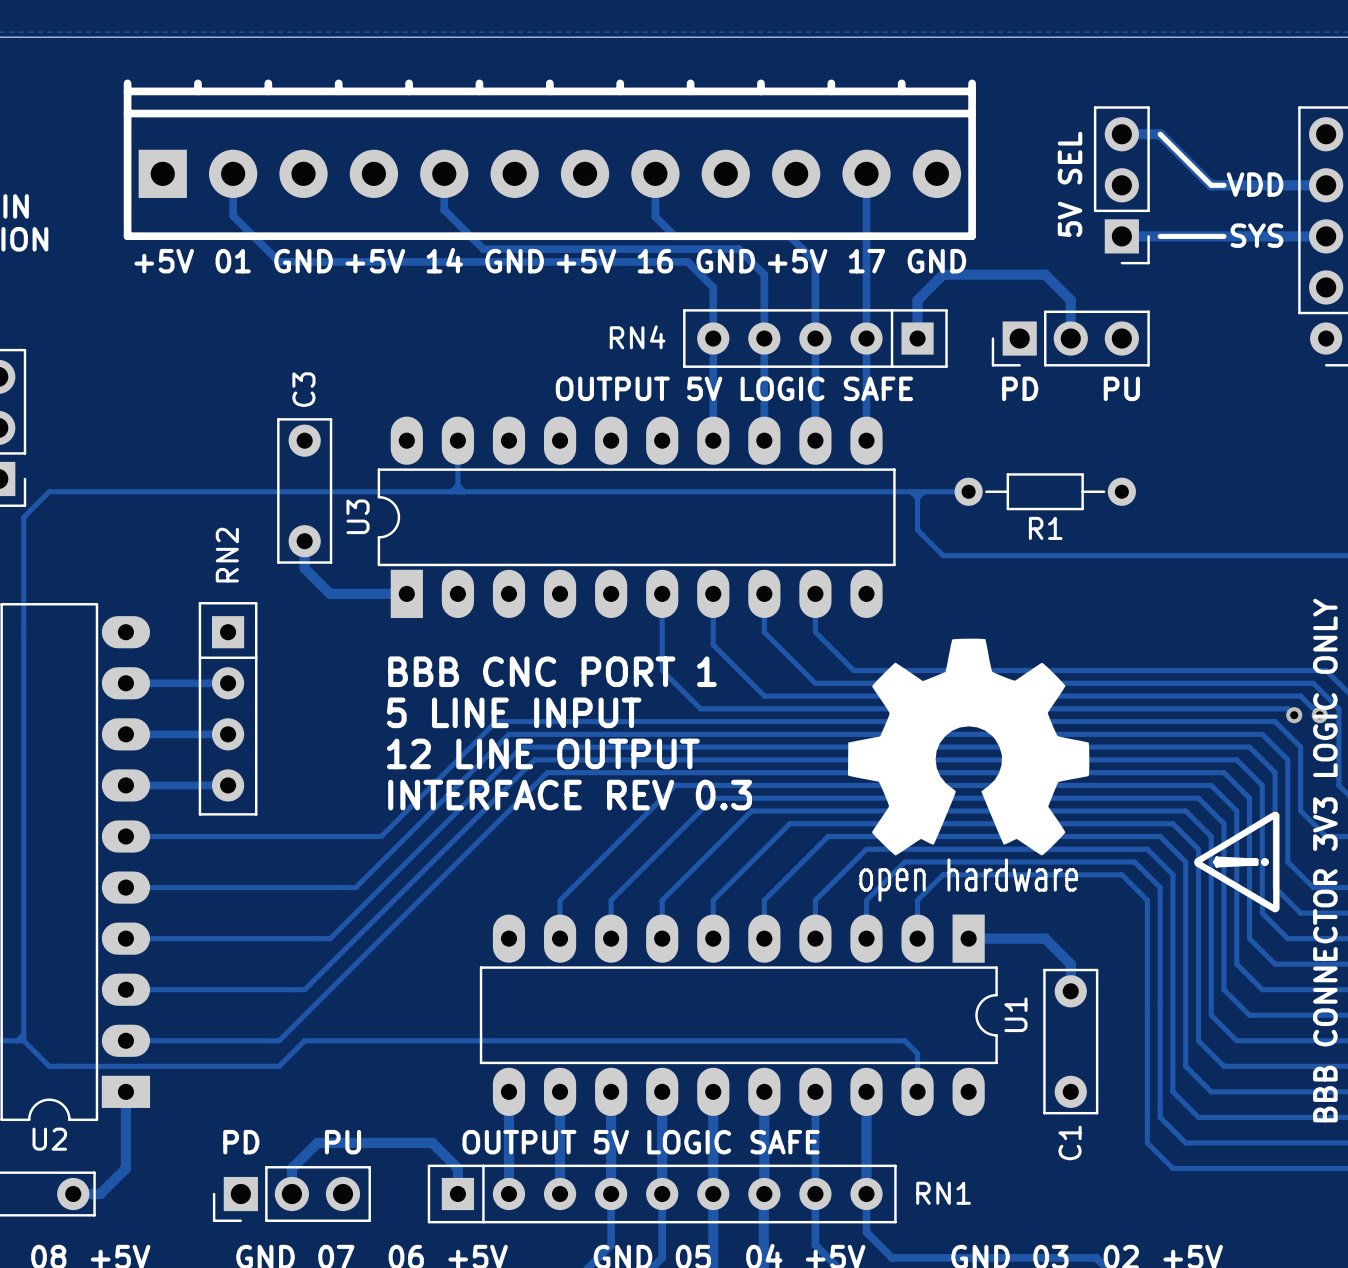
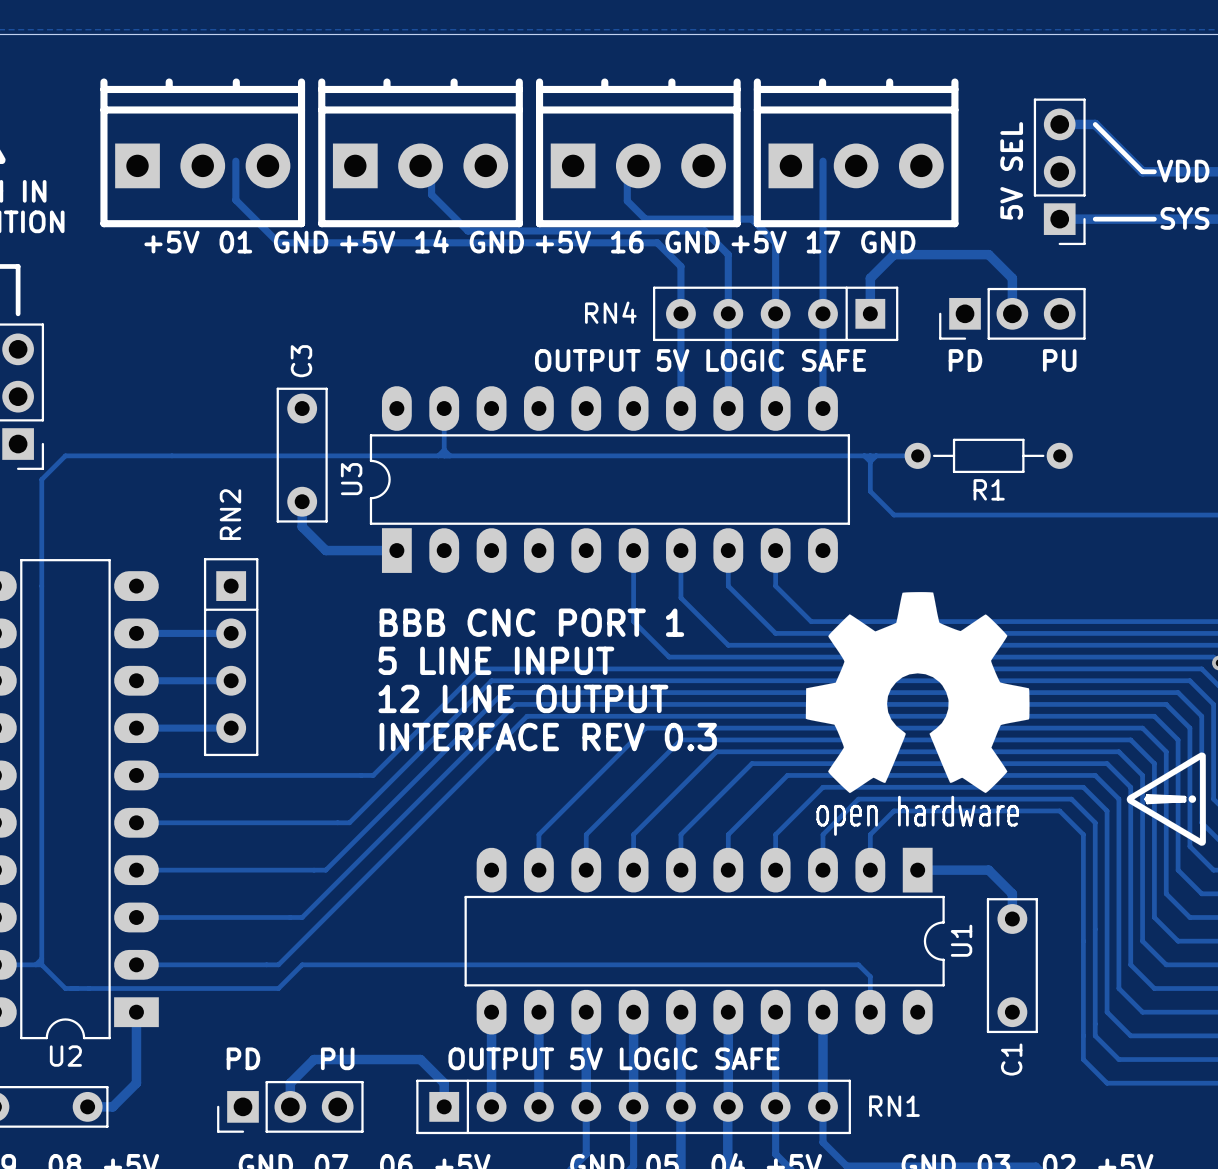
part: (549, 159) -> none
part: none -> (202, 152)
part: none -> (420, 152)
part: none -> (638, 152)
part: none -> (856, 152)

